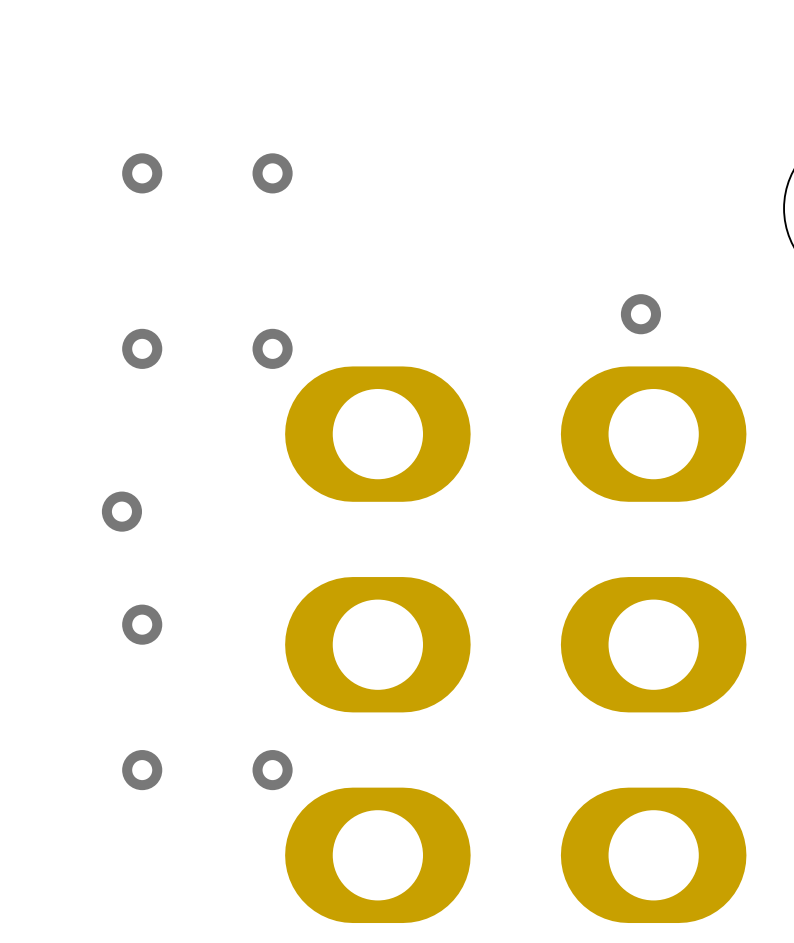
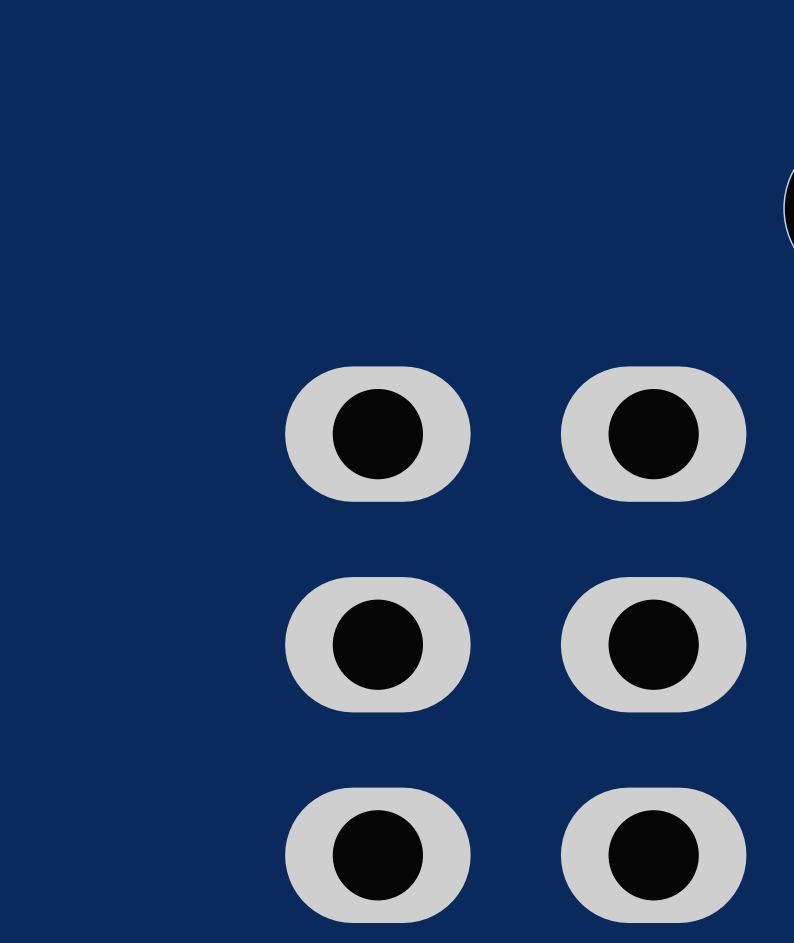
via: (142, 173) -> none
via: (272, 173) -> none
via: (640, 314) -> none
via: (142, 348) -> none
via: (272, 348) -> none
via: (121, 511) -> none
via: (142, 624) -> none
via: (142, 770) -> none
via: (272, 770) -> none

